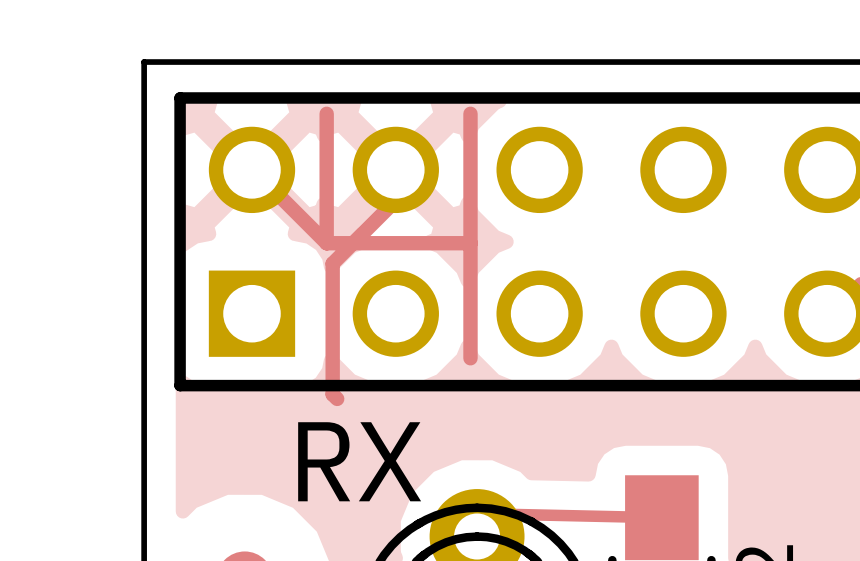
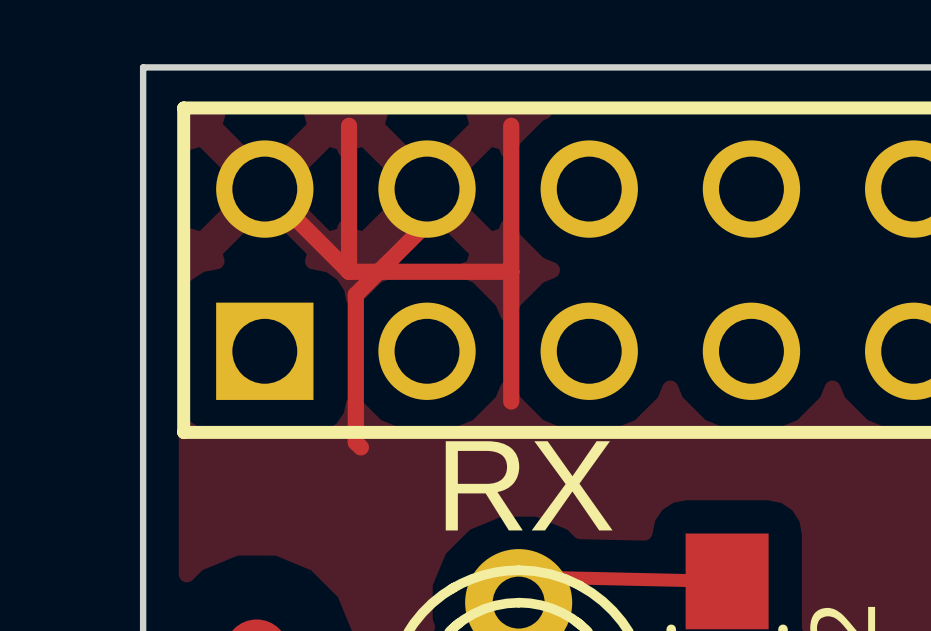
text position: RX (359, 461) -> RX (529, 485)

